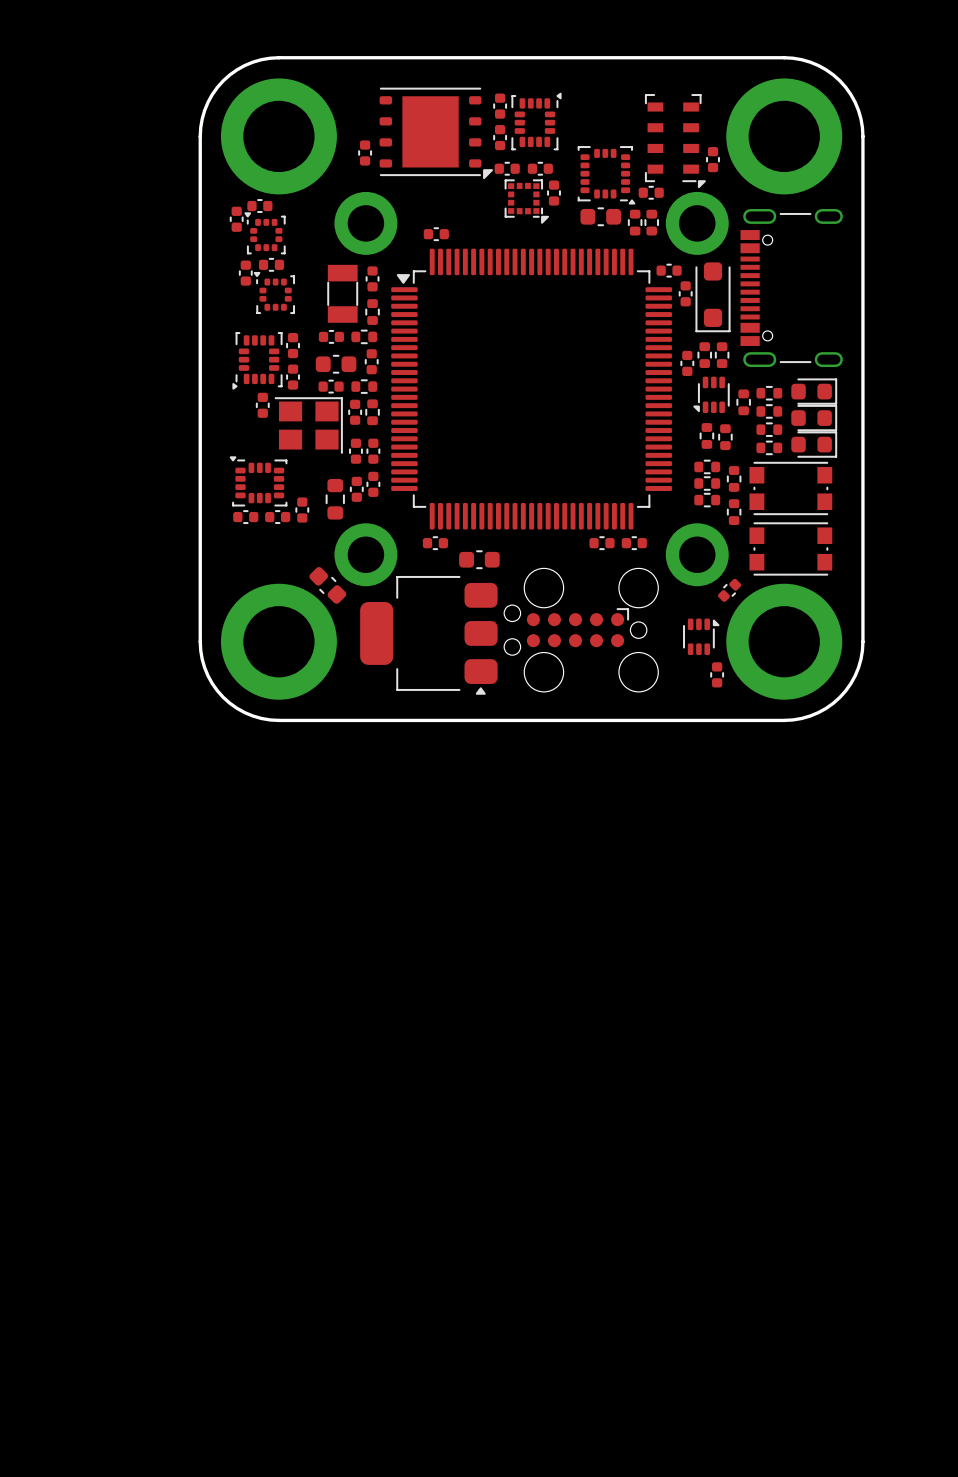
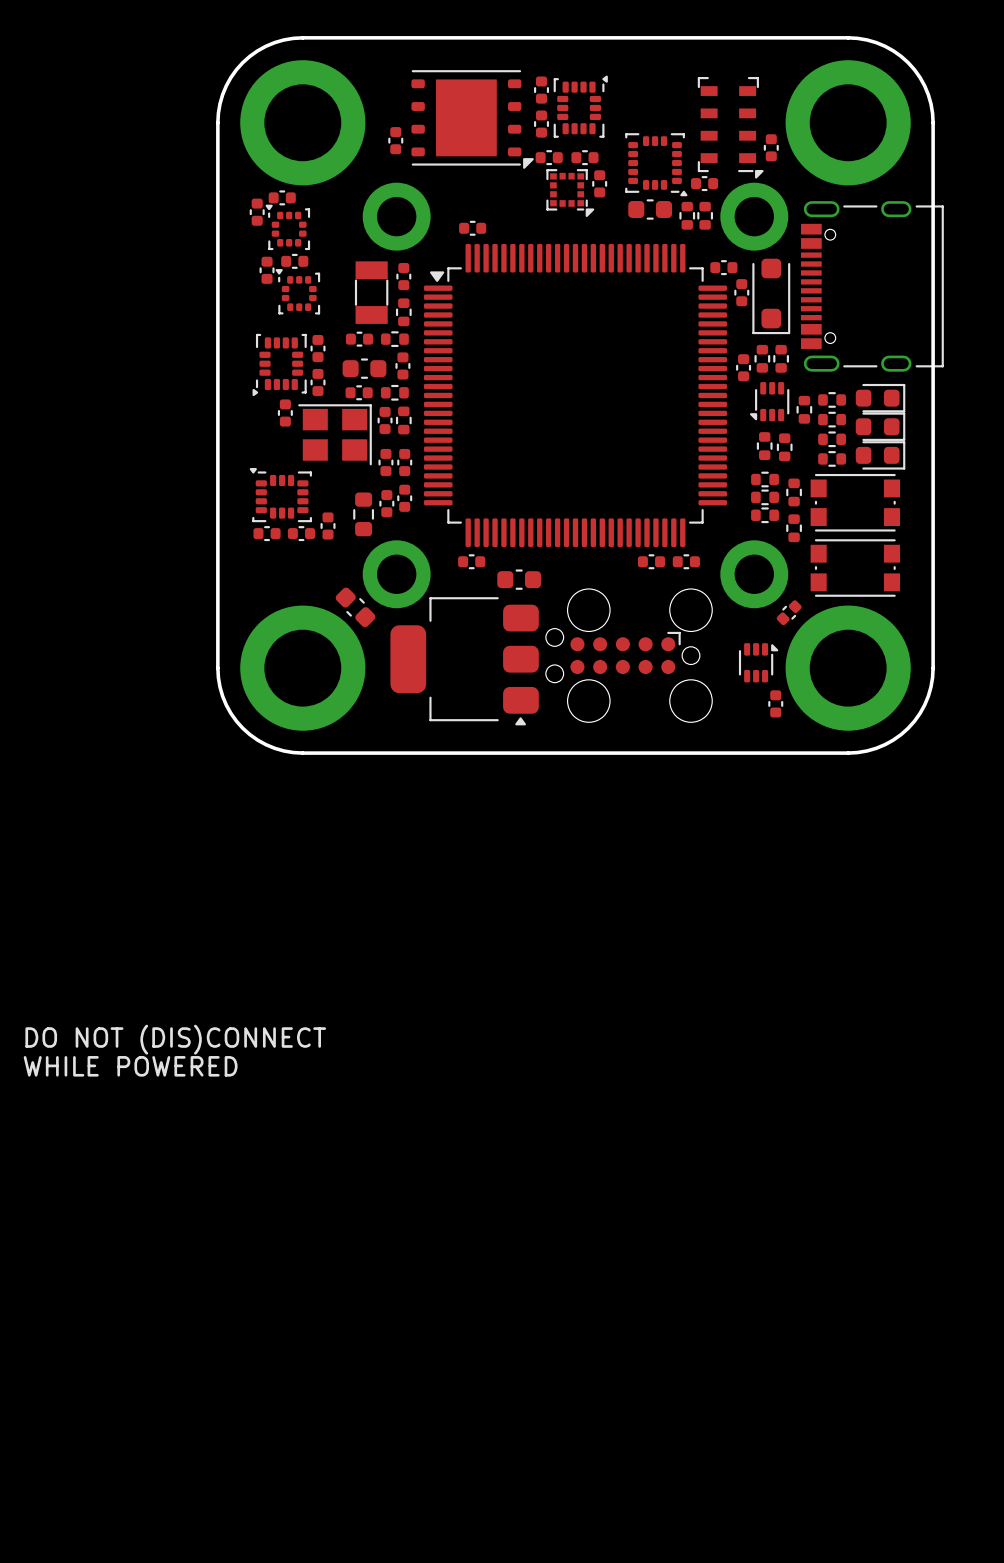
part footprint: [740, 208, 843, 368] -> [800, 201, 944, 372]
text: none -> DO NOT (DIS)CONNECT (175, 1039)
text: none -> WHILE POWERED (130, 1066)

